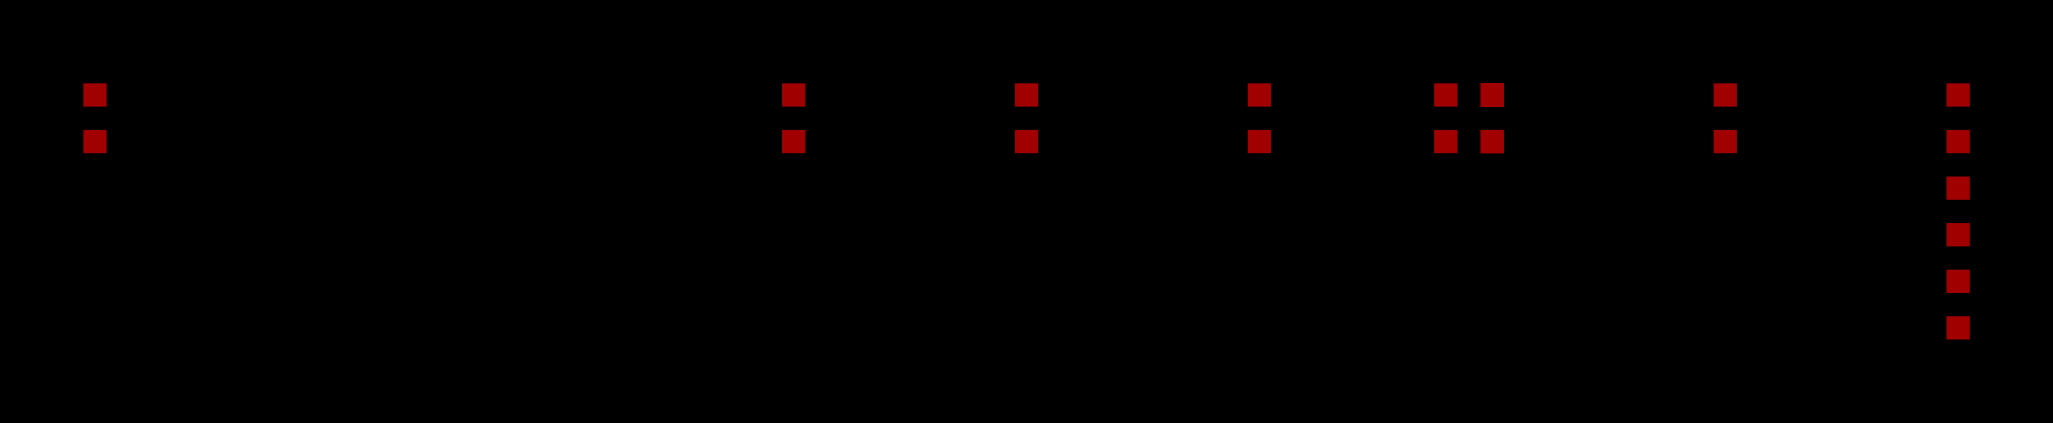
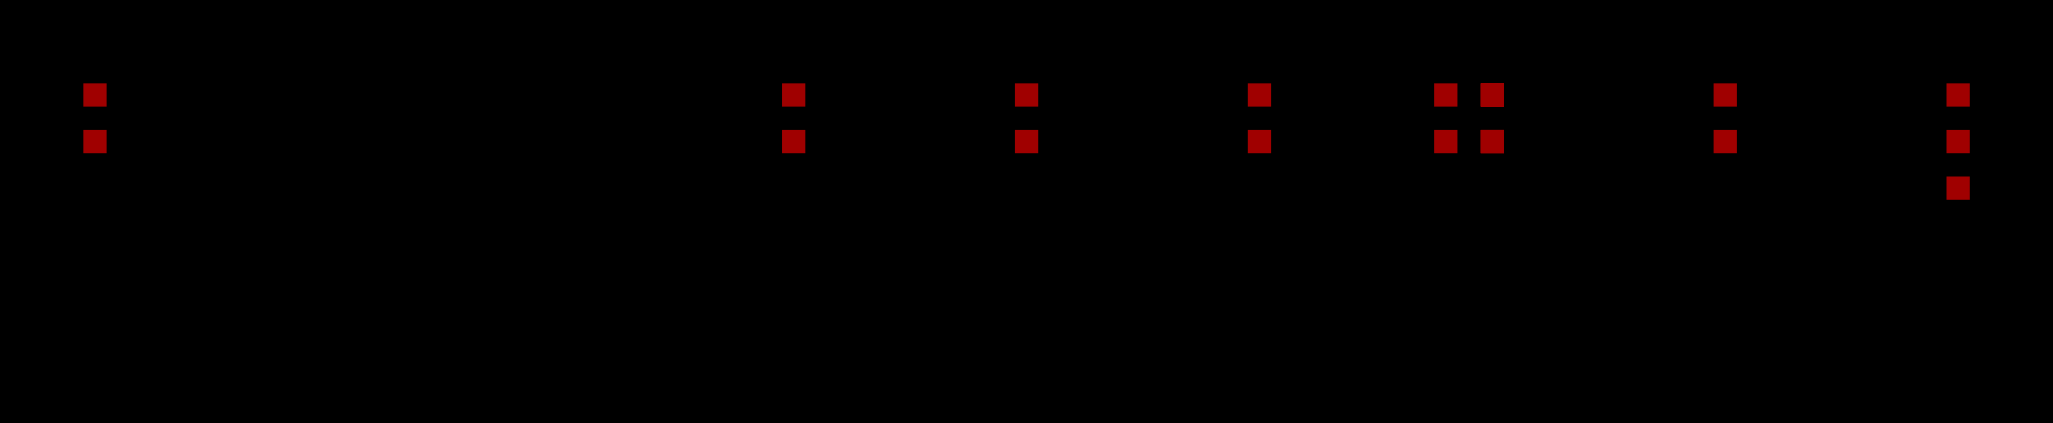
part: (1958, 211) -> none

